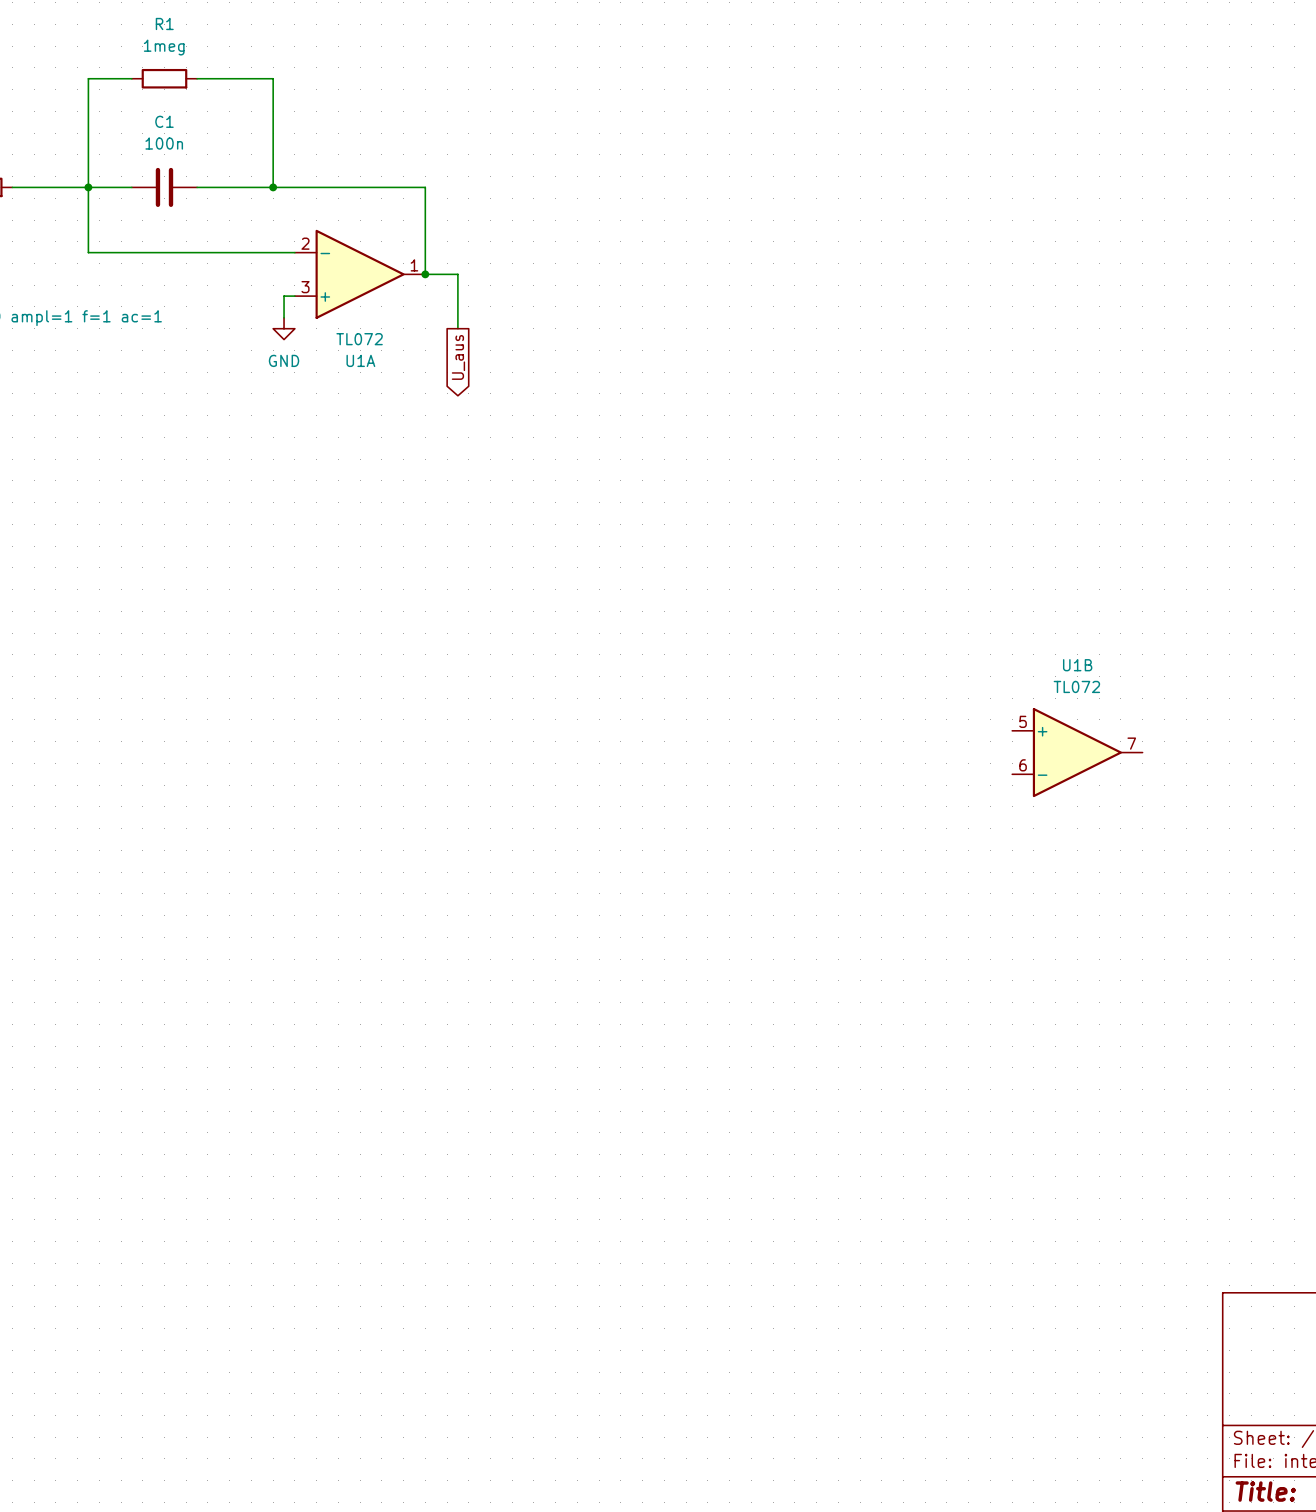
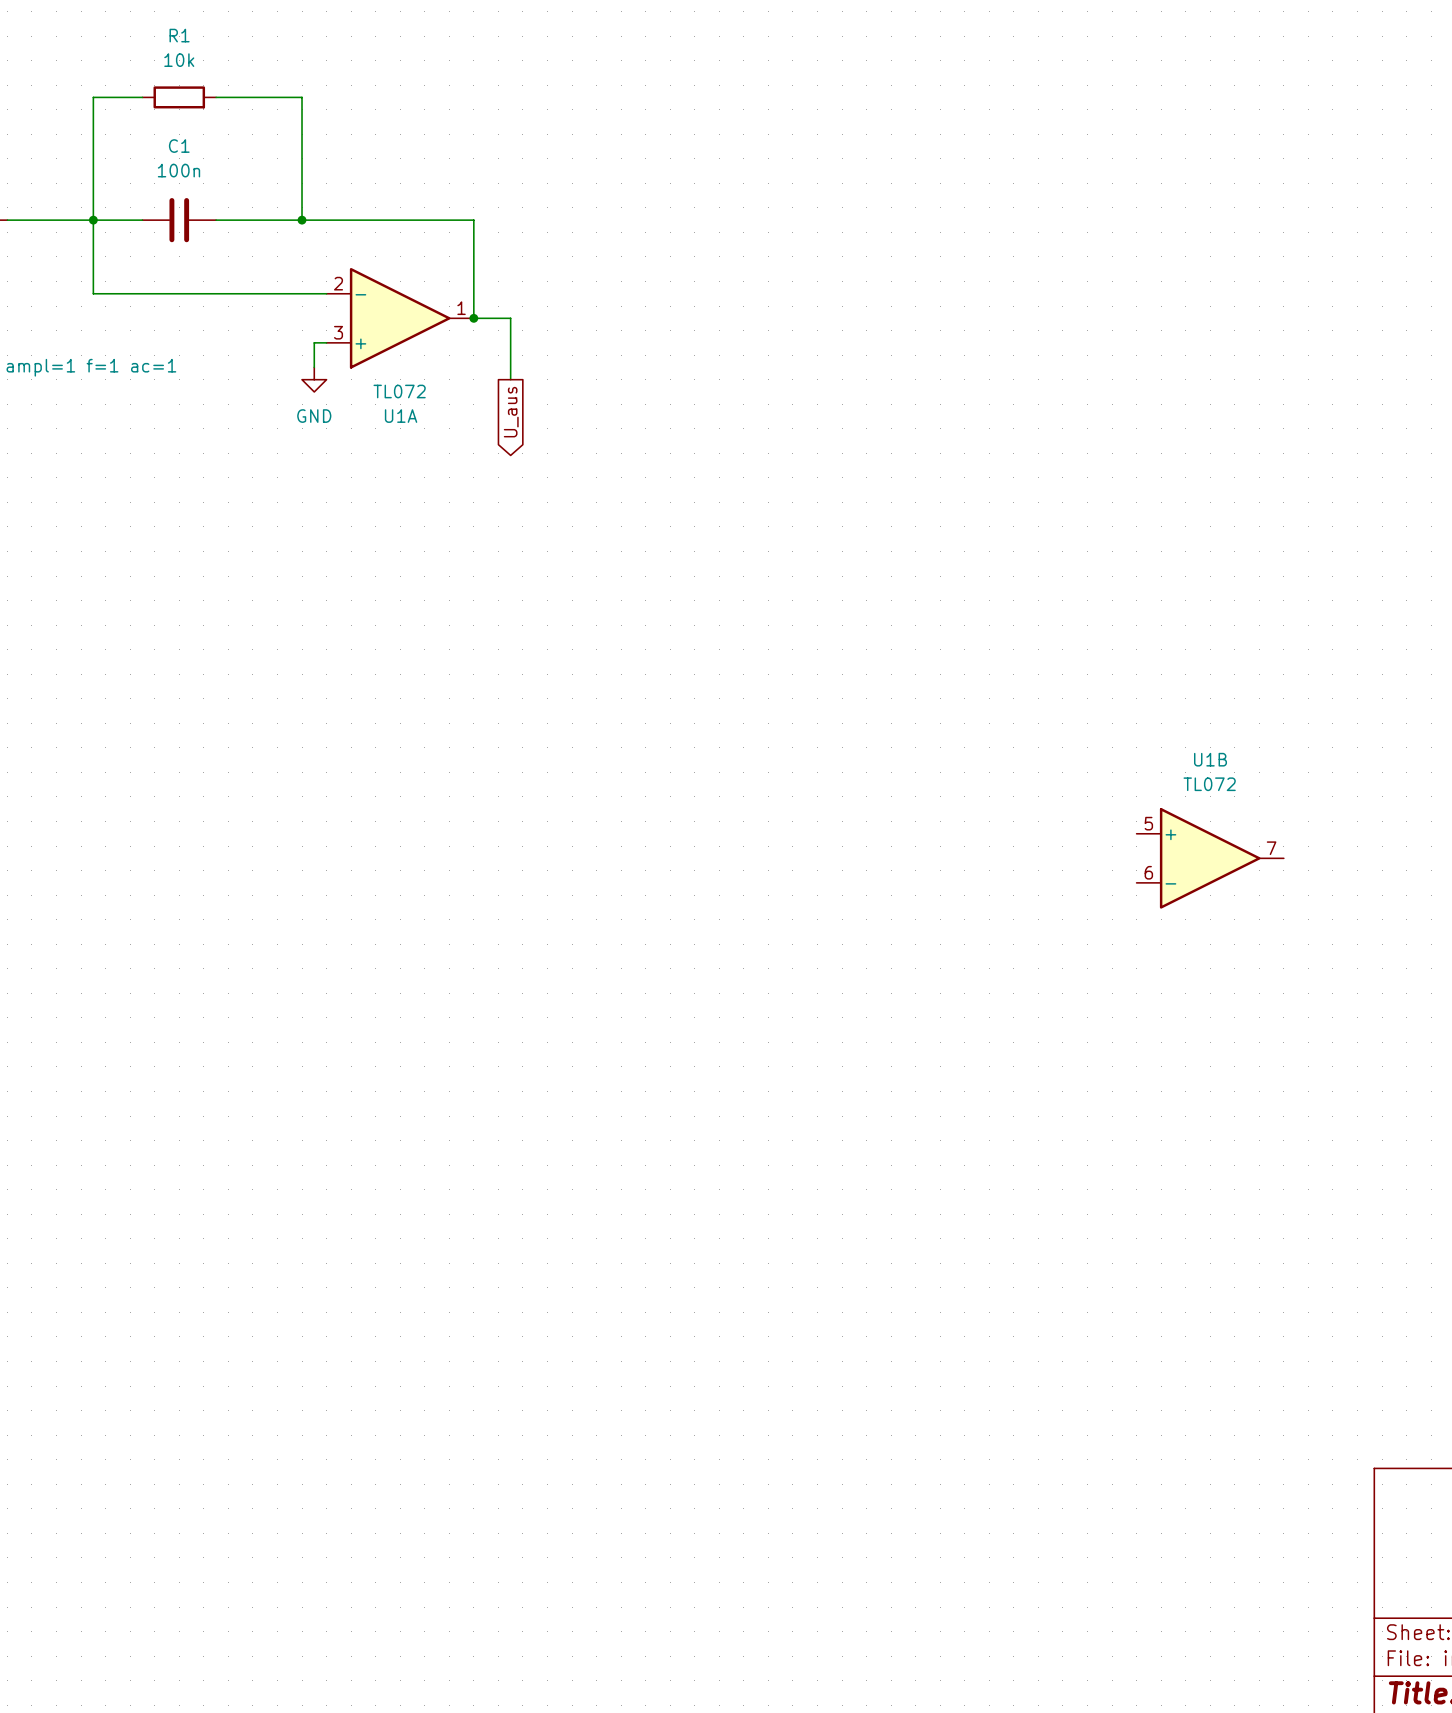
R1 value: 1meg (164, 47) -> 10k (179, 60)

